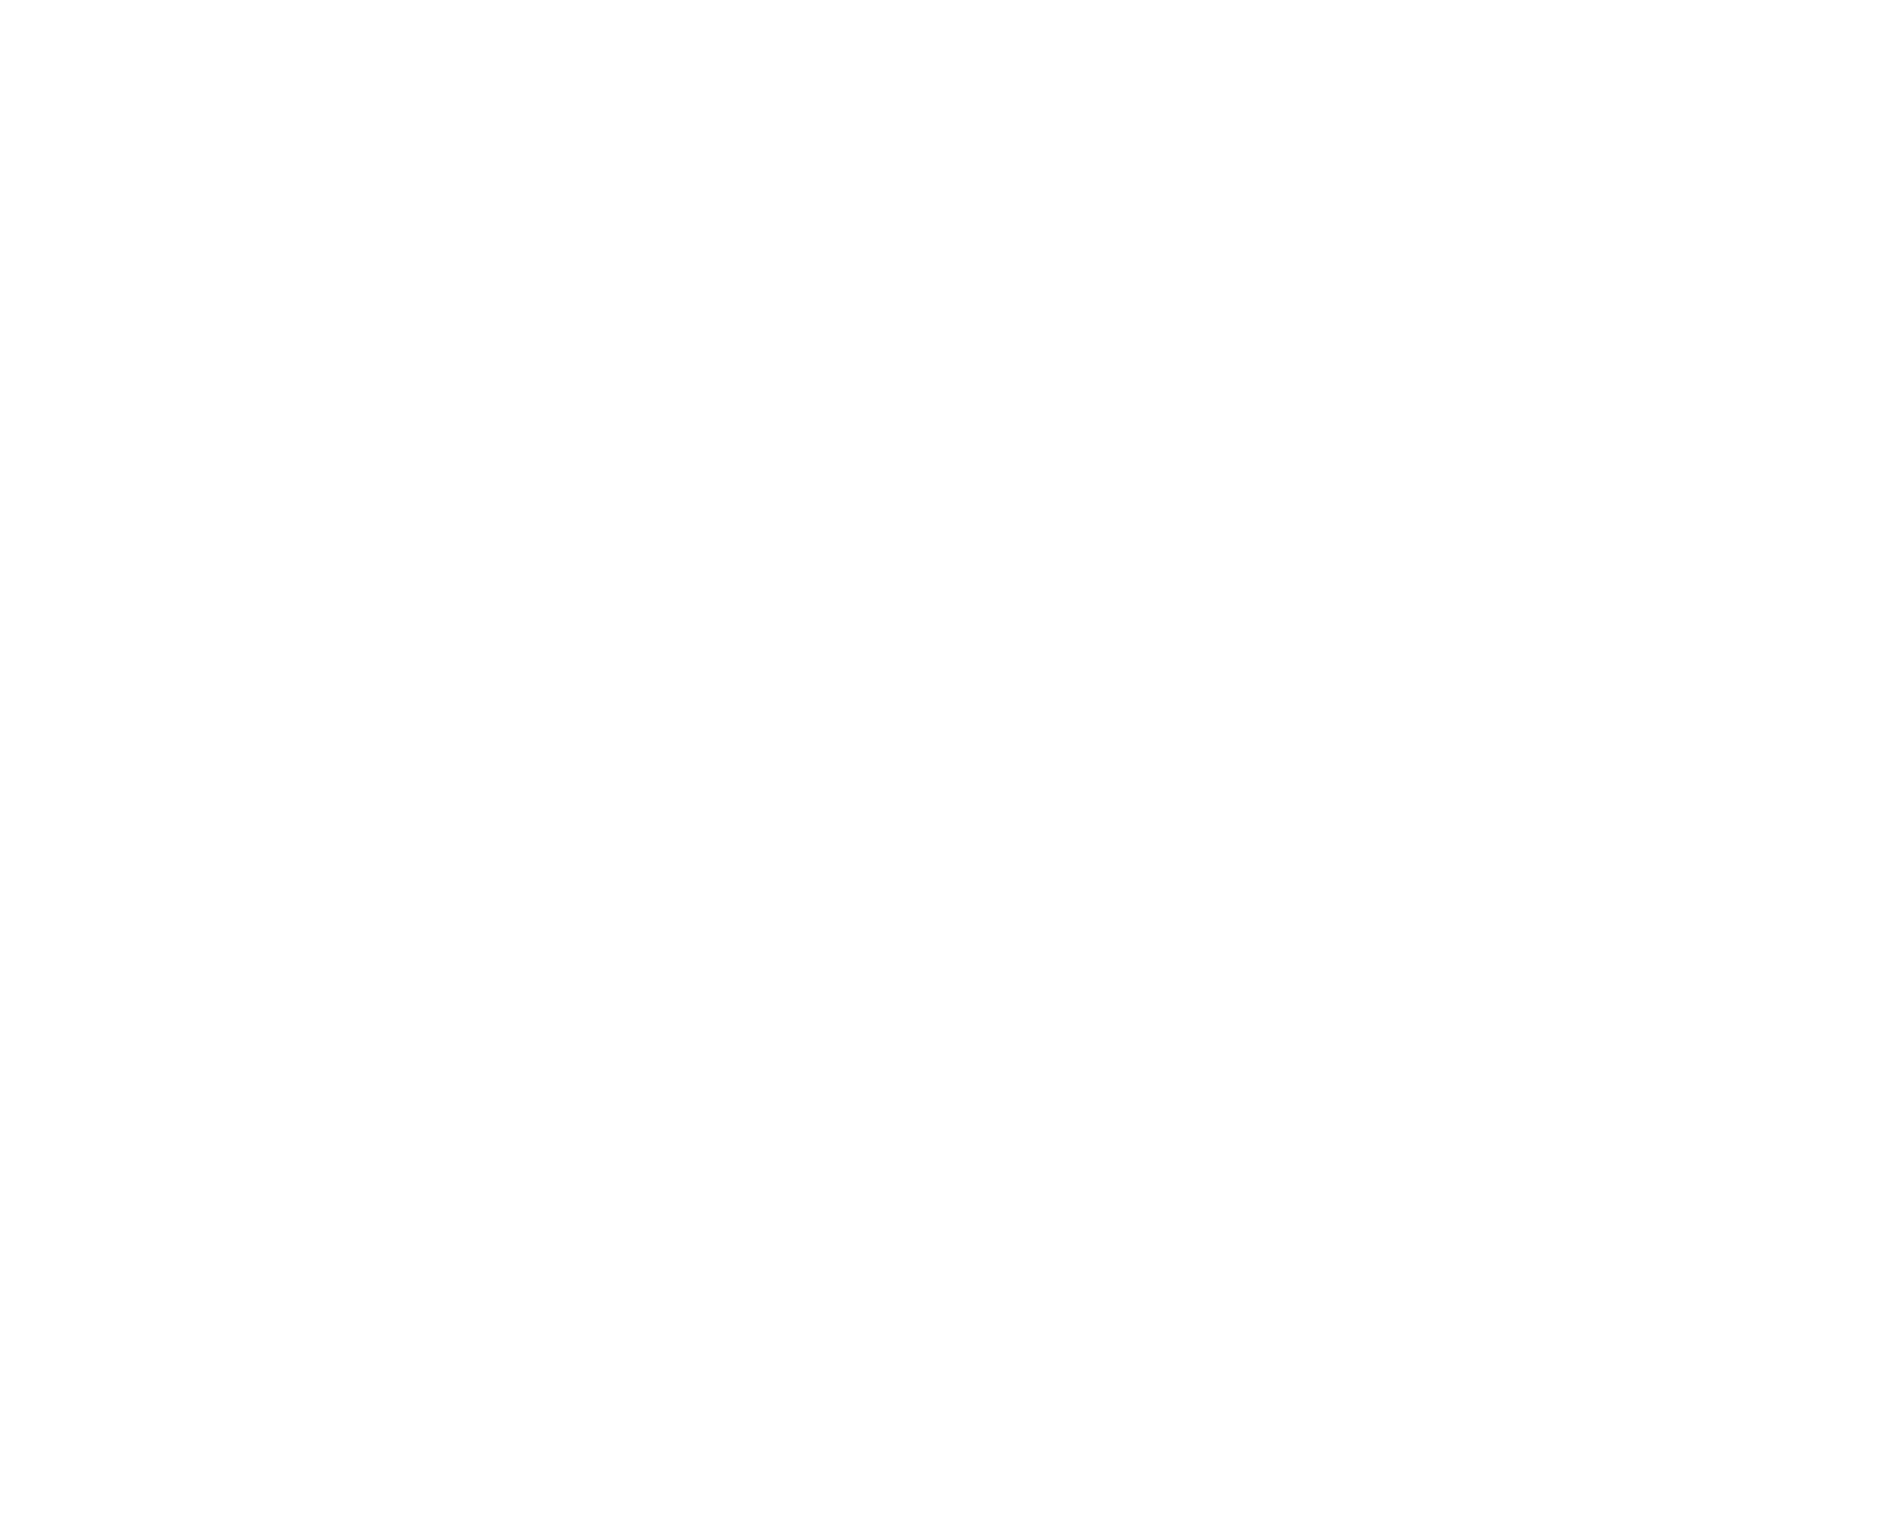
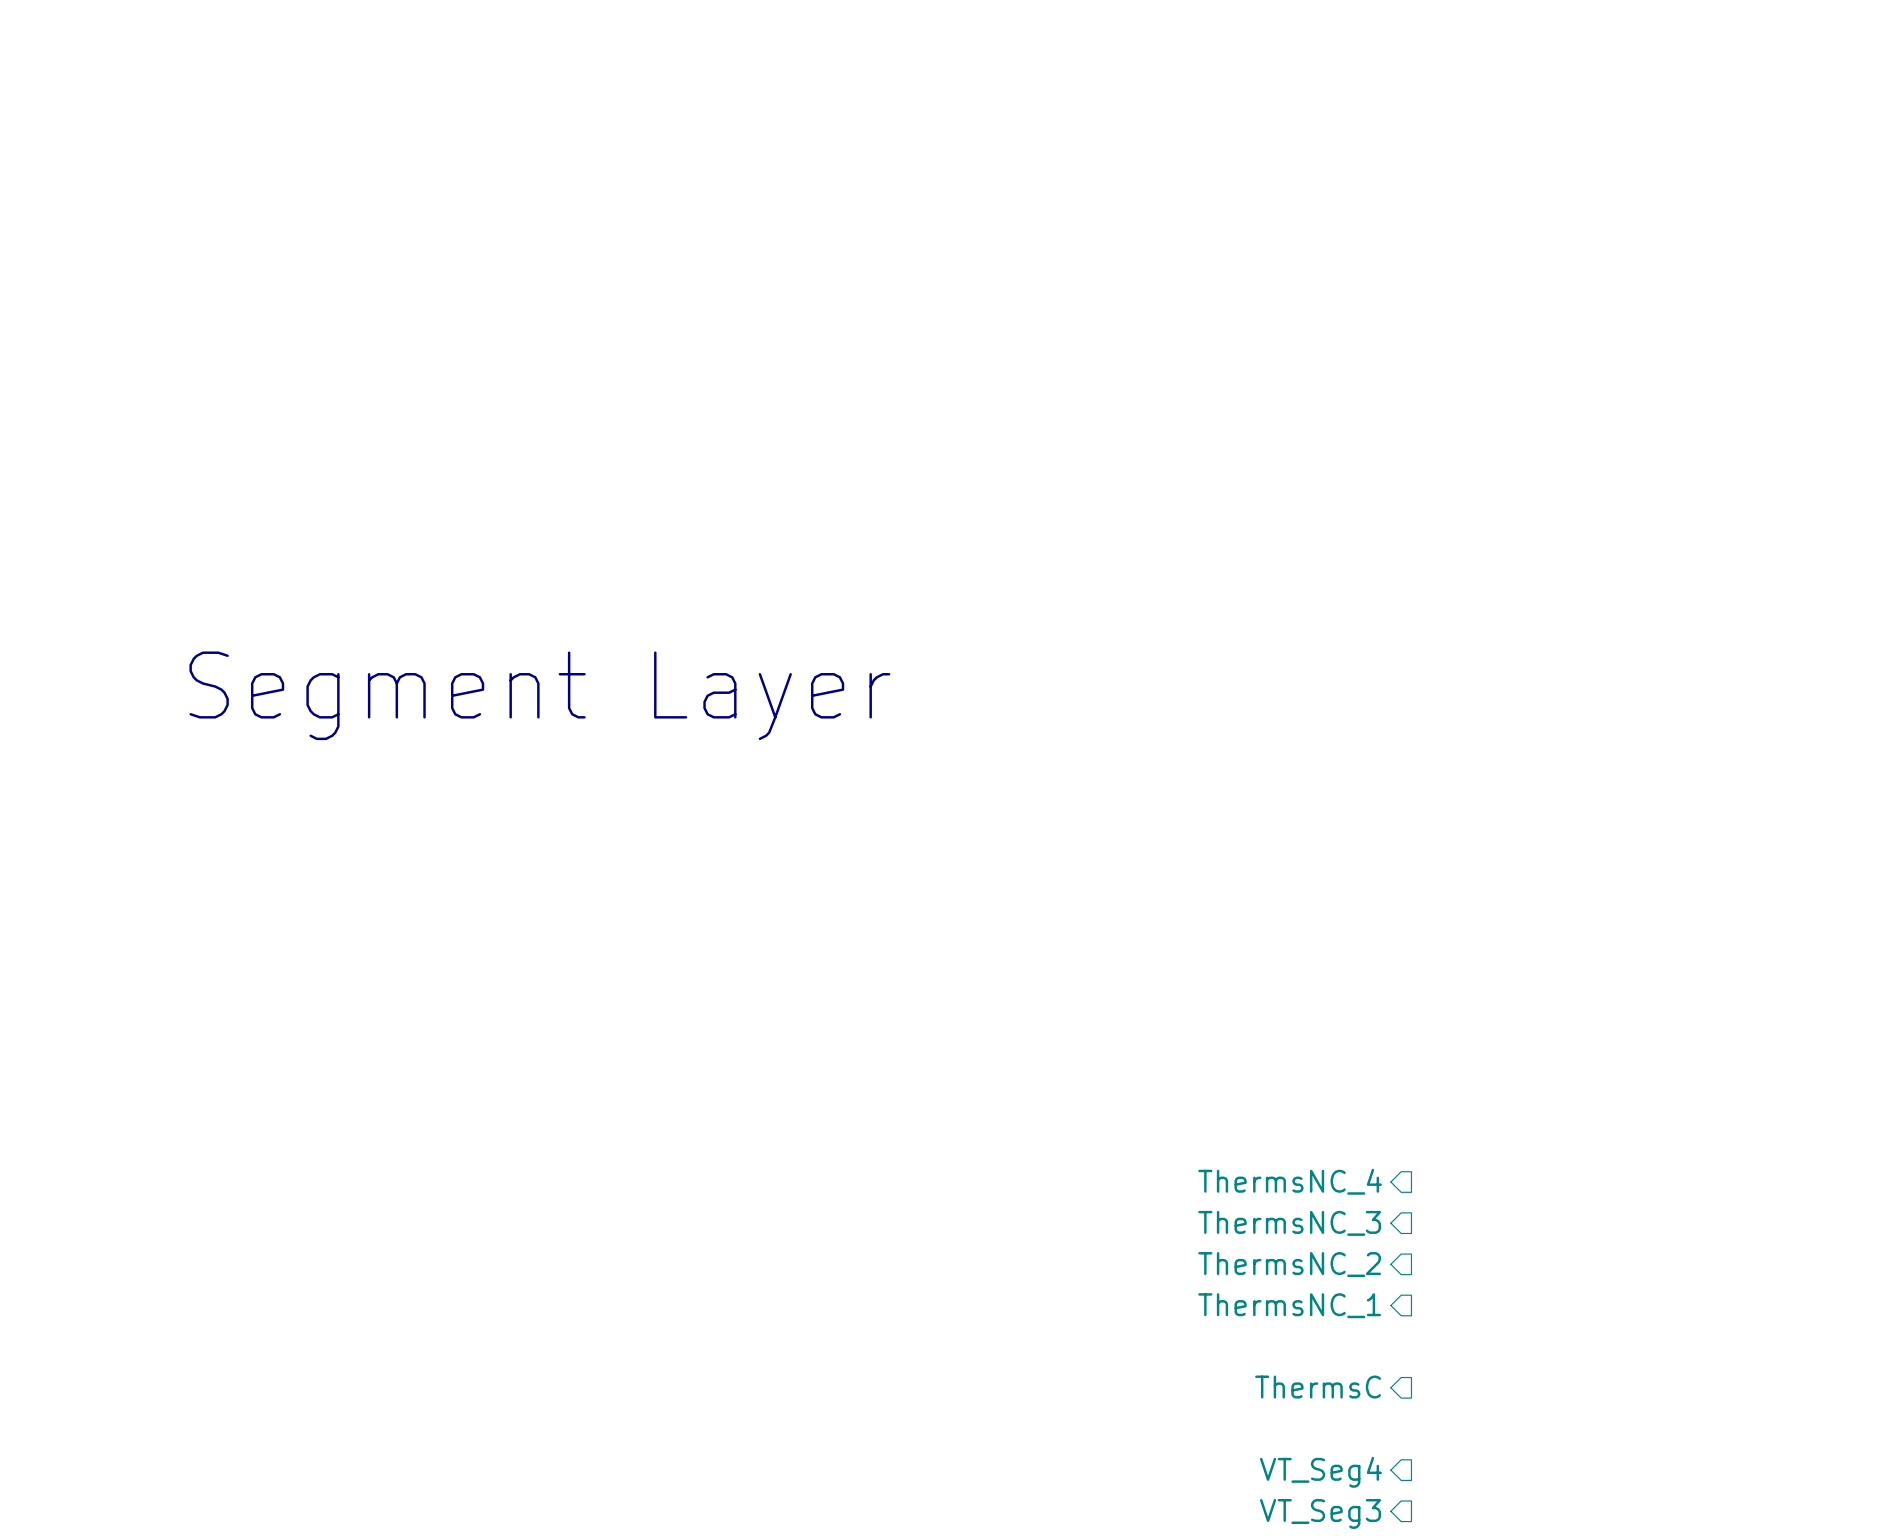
text: none -> Segment Layer (539, 695)
sheet pin: none -> ThermsNC_4 (1290, 1181)
sheet pin: none -> ThermsNC_3 (1289, 1223)
sheet pin: none -> ThermsNC_2 (1289, 1264)
sheet pin: none -> ThermsNC_1 (1289, 1305)
sheet pin: none -> ThermsC (1318, 1387)
sheet pin: none -> VT_Seg4 (1320, 1472)
sheet pin: none -> VT_Seg3 (1320, 1513)

